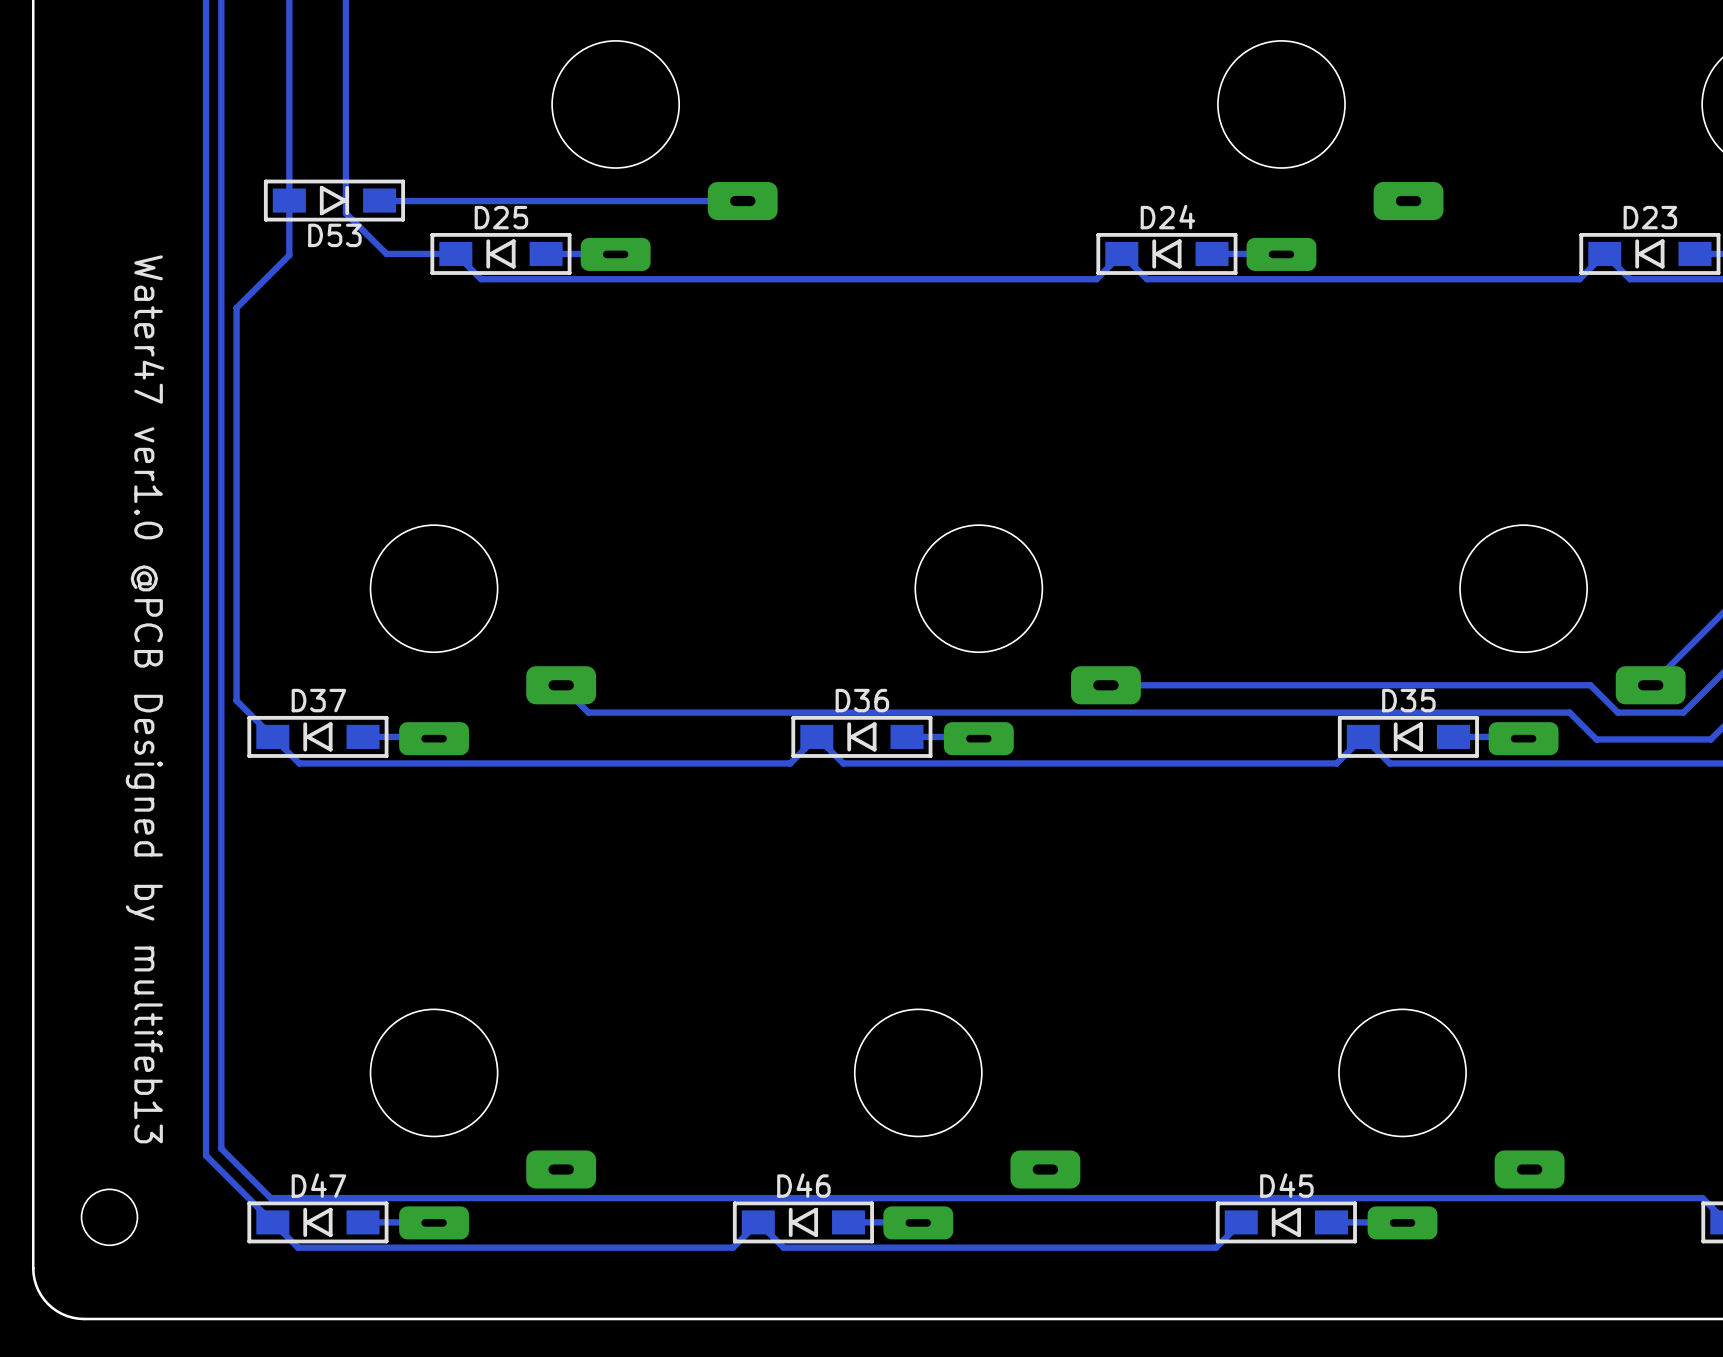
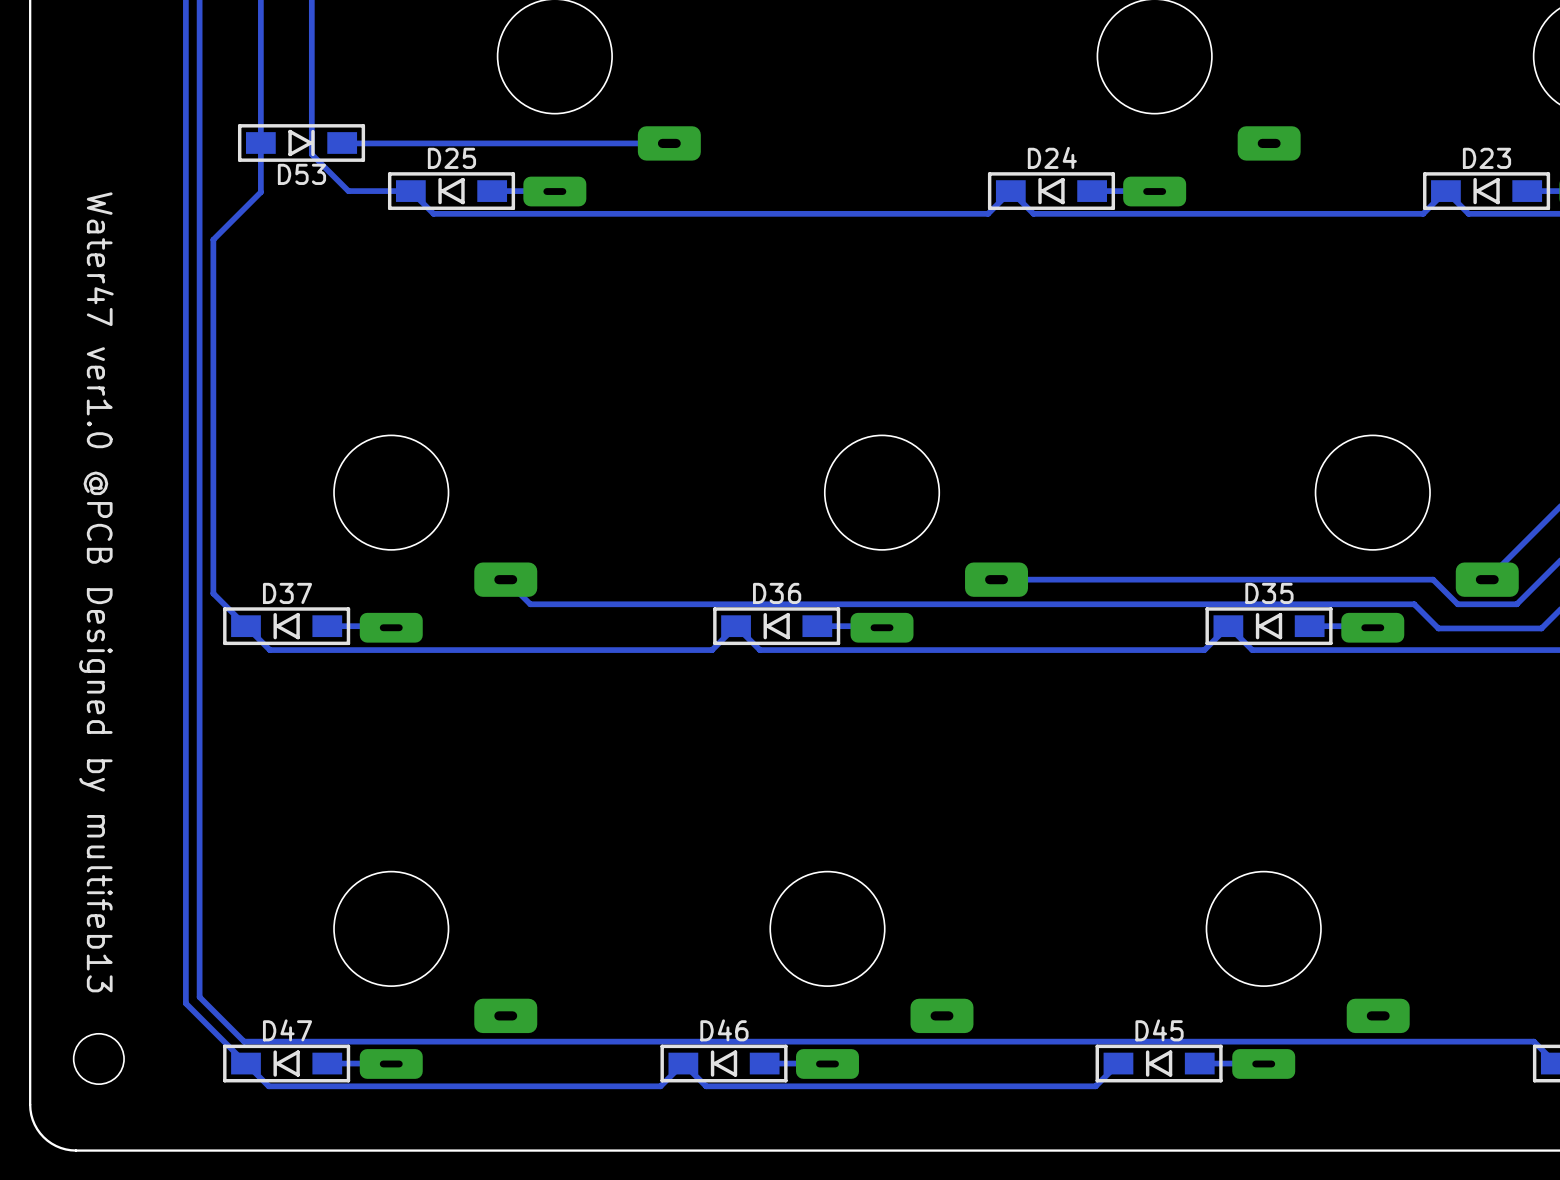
text position: Water47 ver1.0 @PCB Designed by multifeb13 (144, 699) -> Water47 ver1.0 @PCB Designed by multifeb13 (96, 592)

